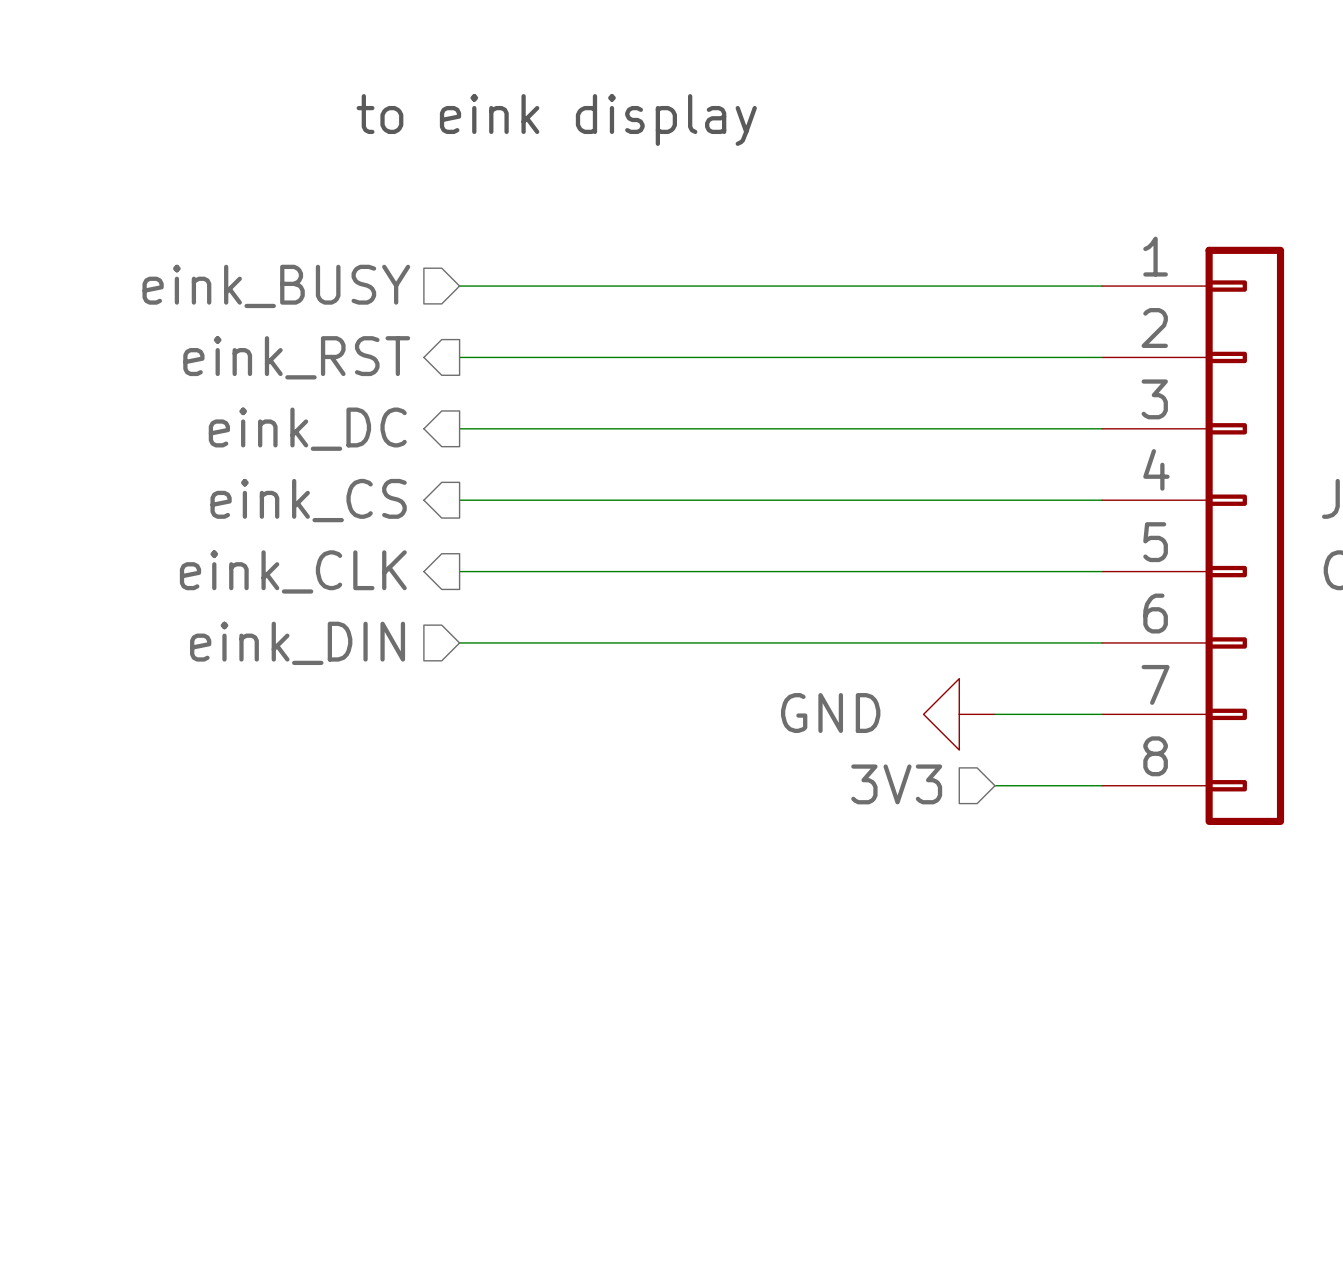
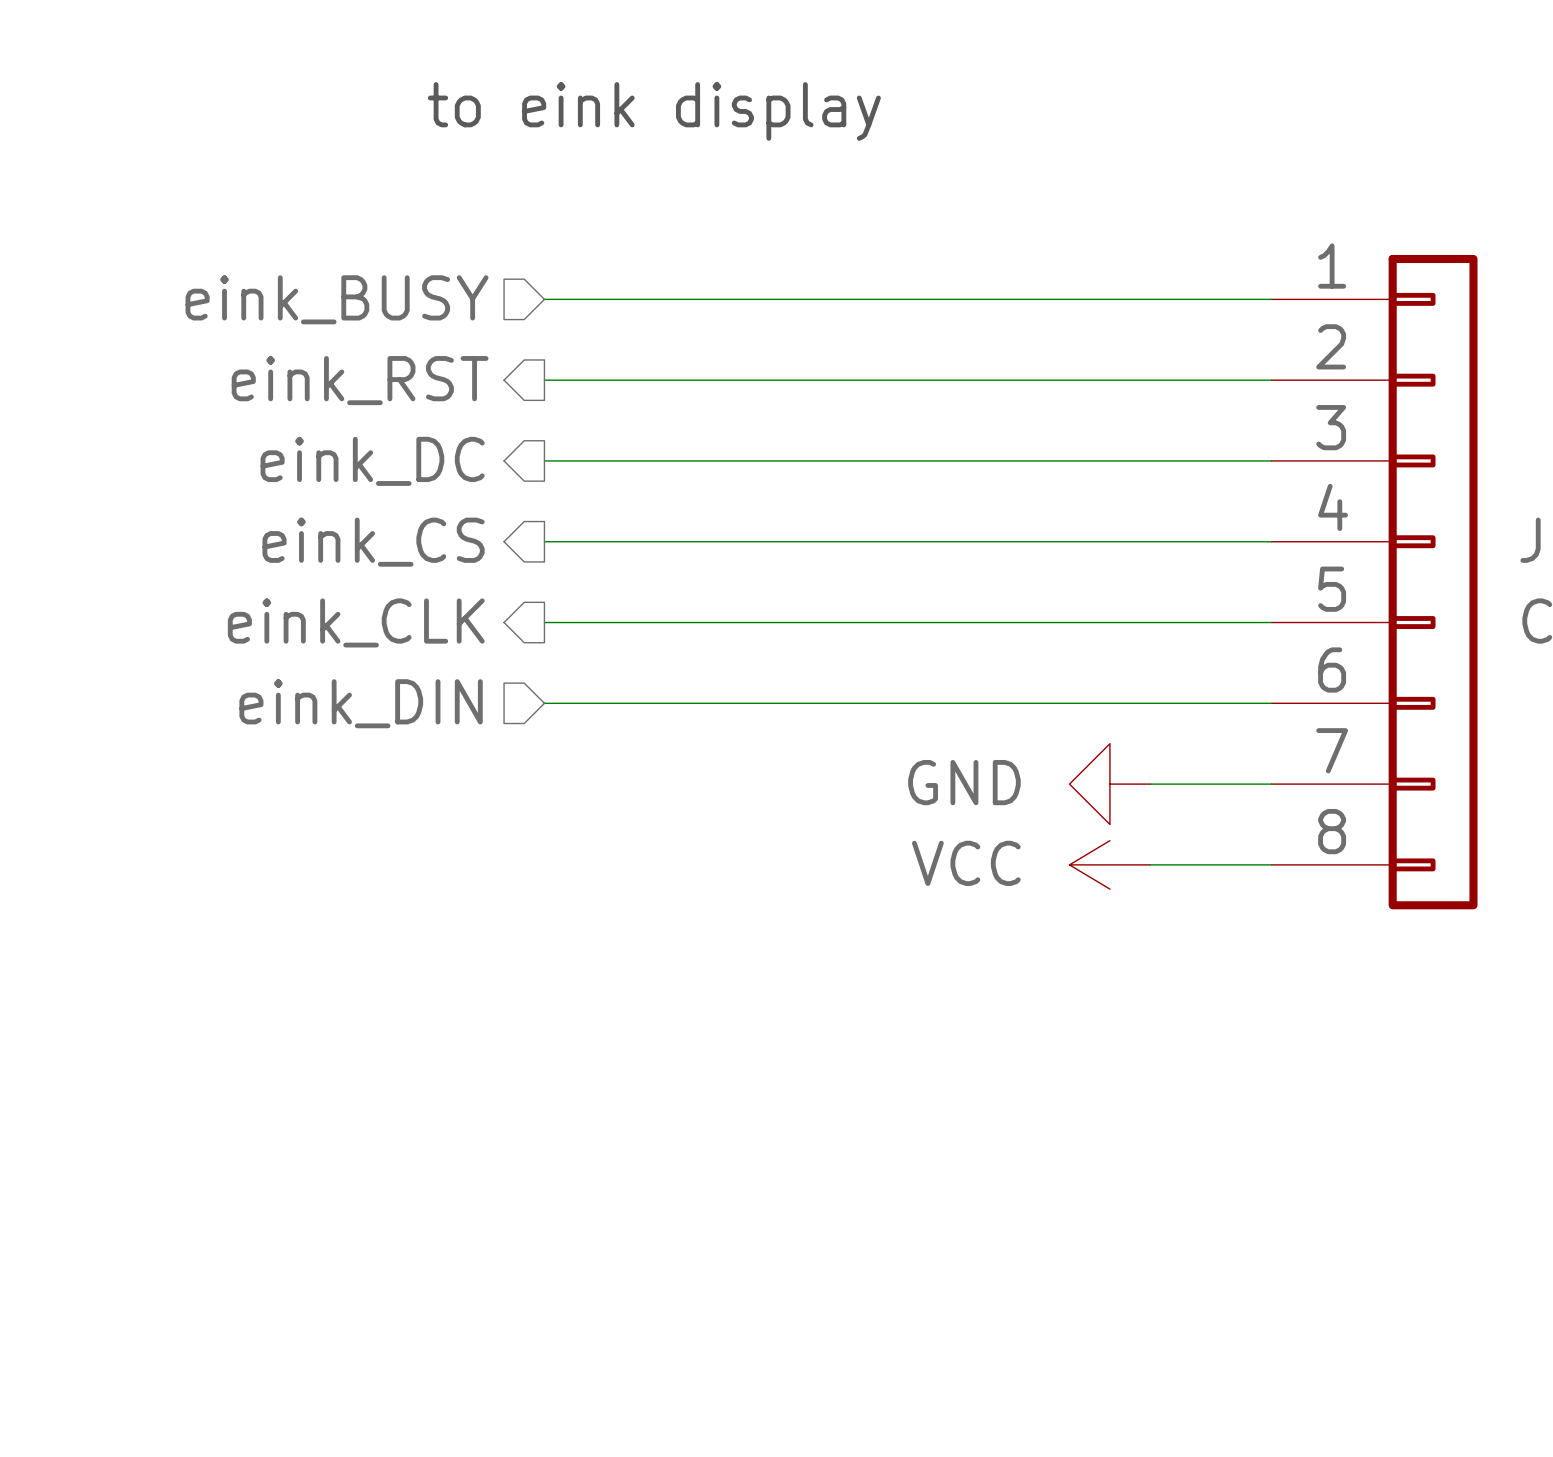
hierarchical label: 3V3 (896, 784) -> none
power symbol: none -> VCC (1109, 864)

